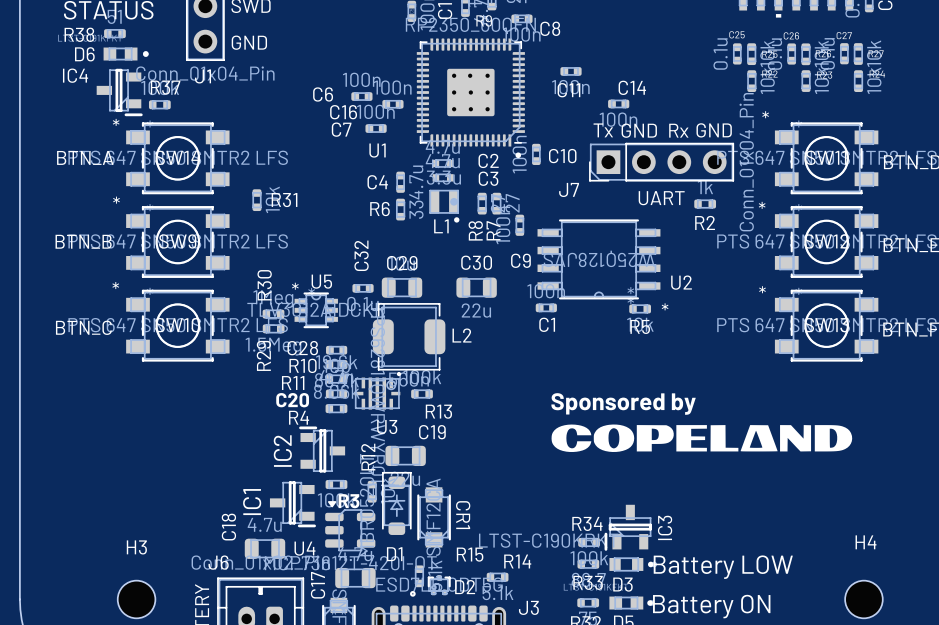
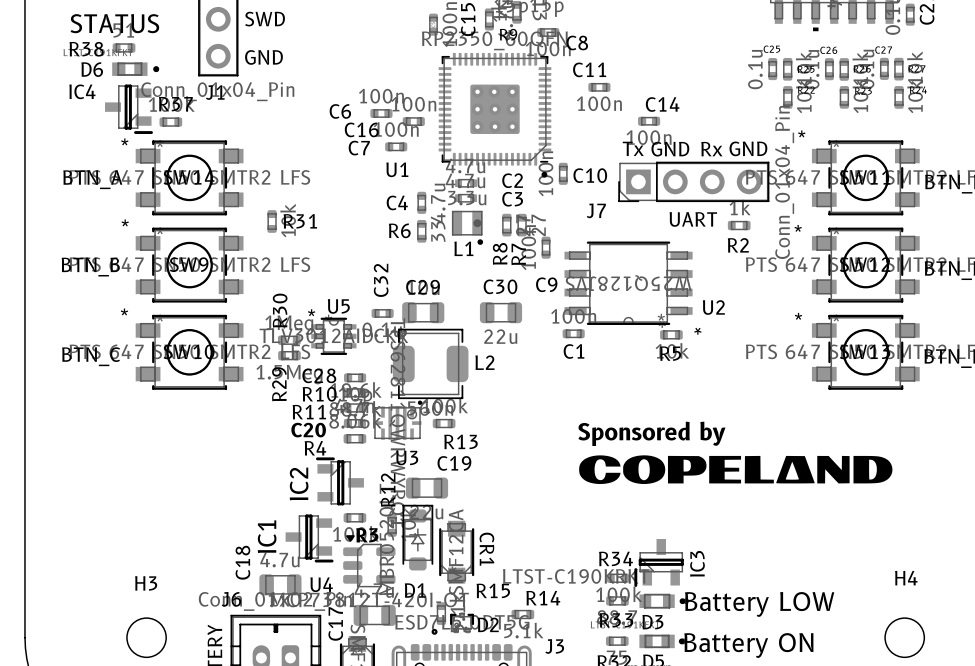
C11 name position: C11 (568, 90) -> C11 (589, 69)

